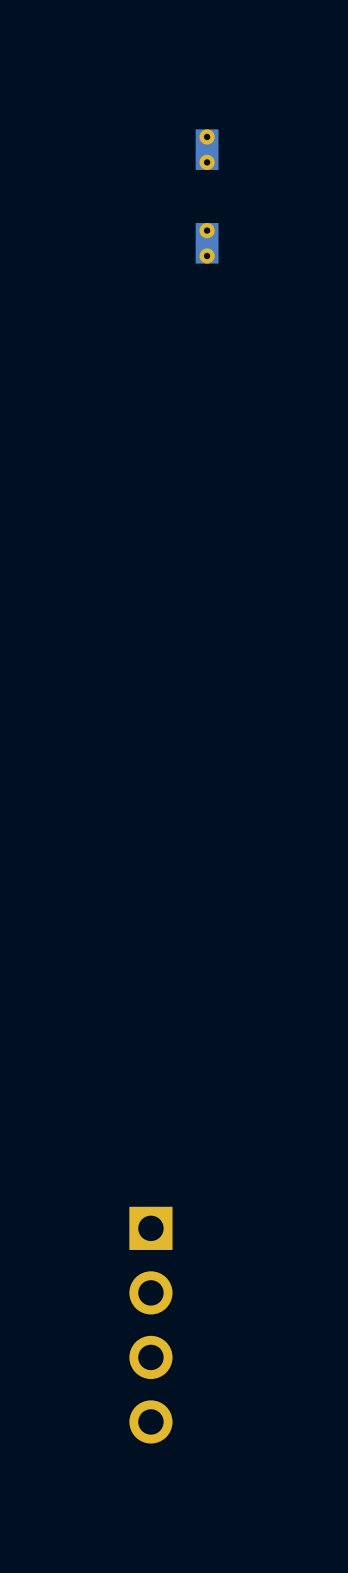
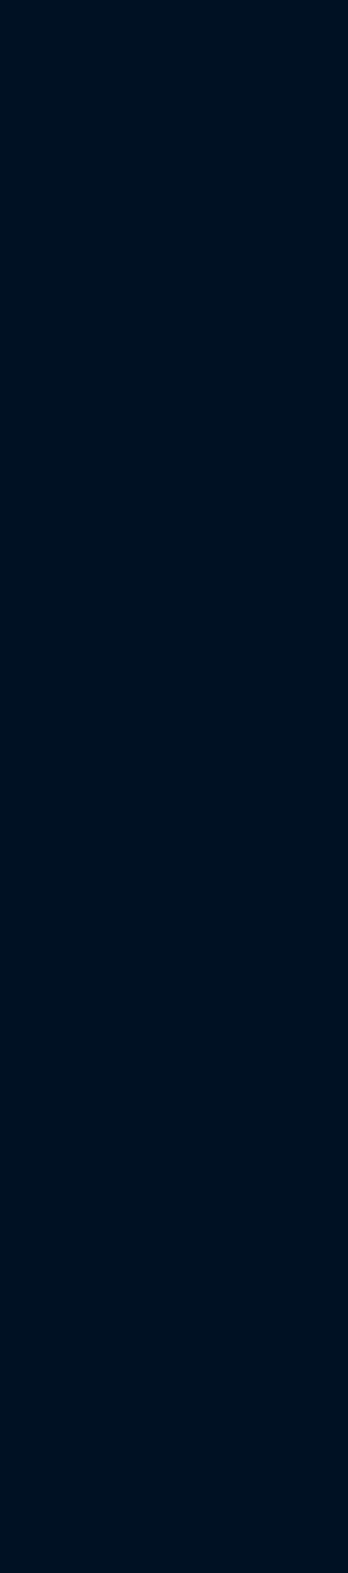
part: (207, 149) -> none
part: (207, 243) -> none
part: (150, 1325) -> none

